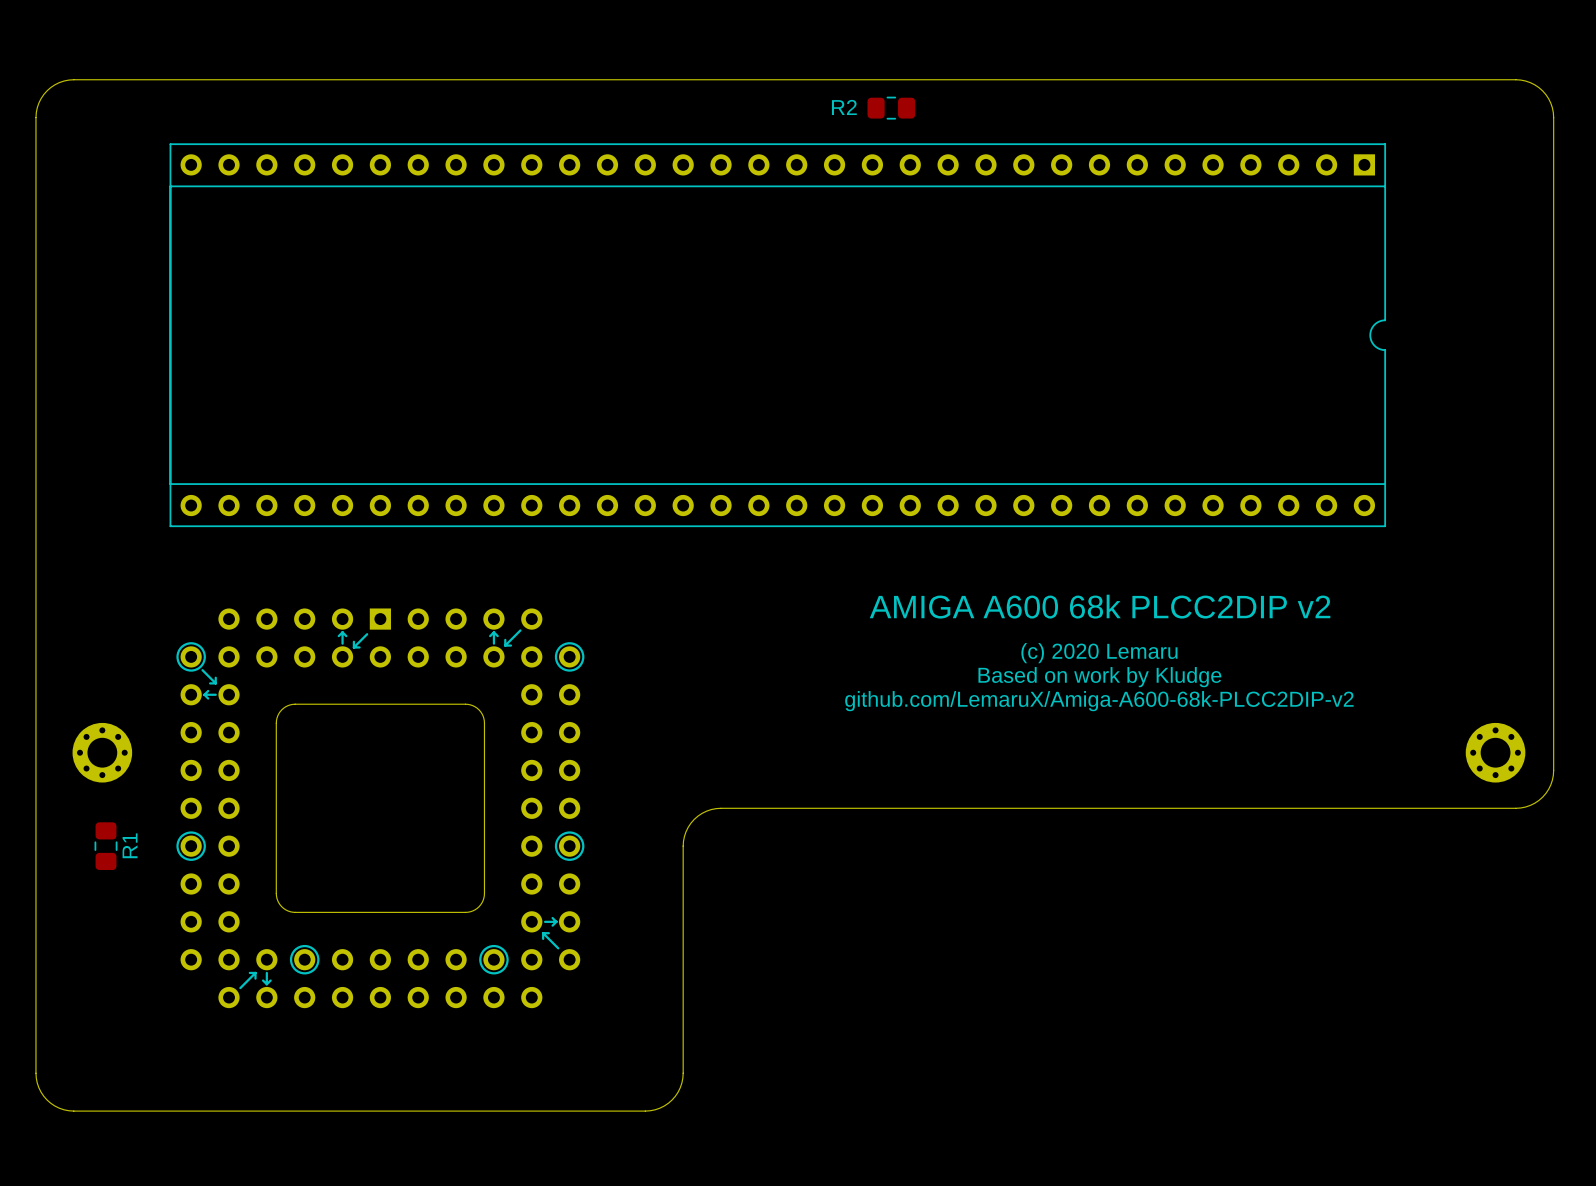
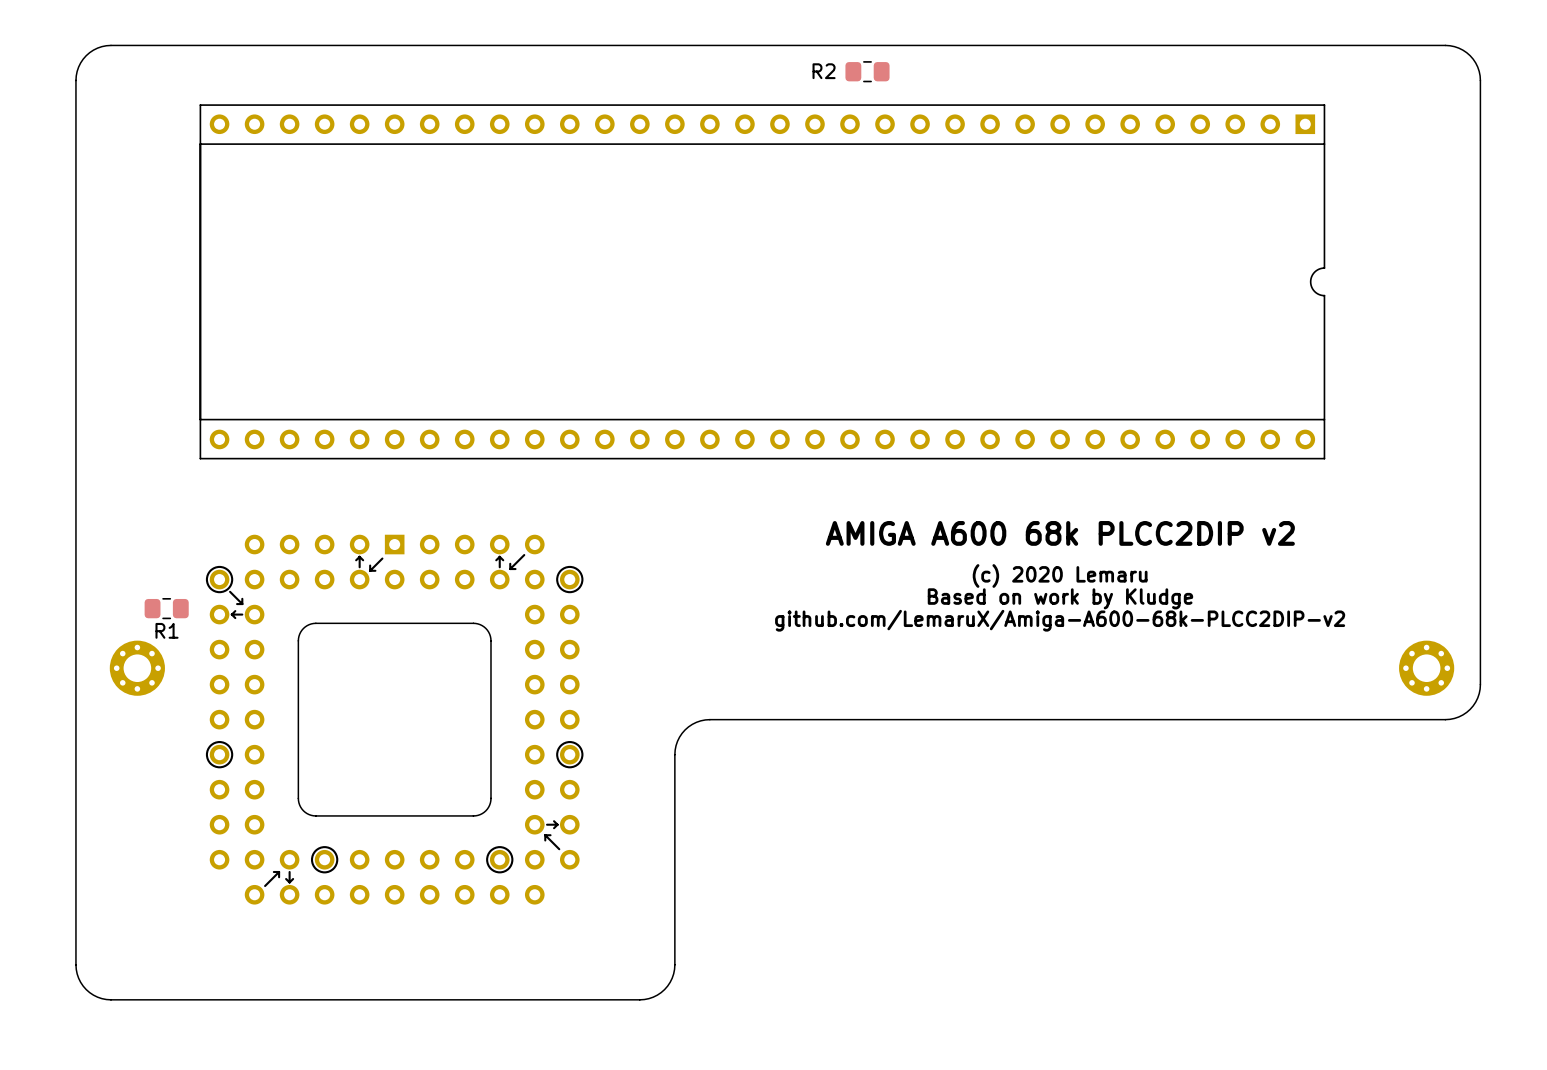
R1 rotation: 0° (105, 846) -> 90° clockwise (166, 608)
R1 position: (105, 846) -> (166, 608)

